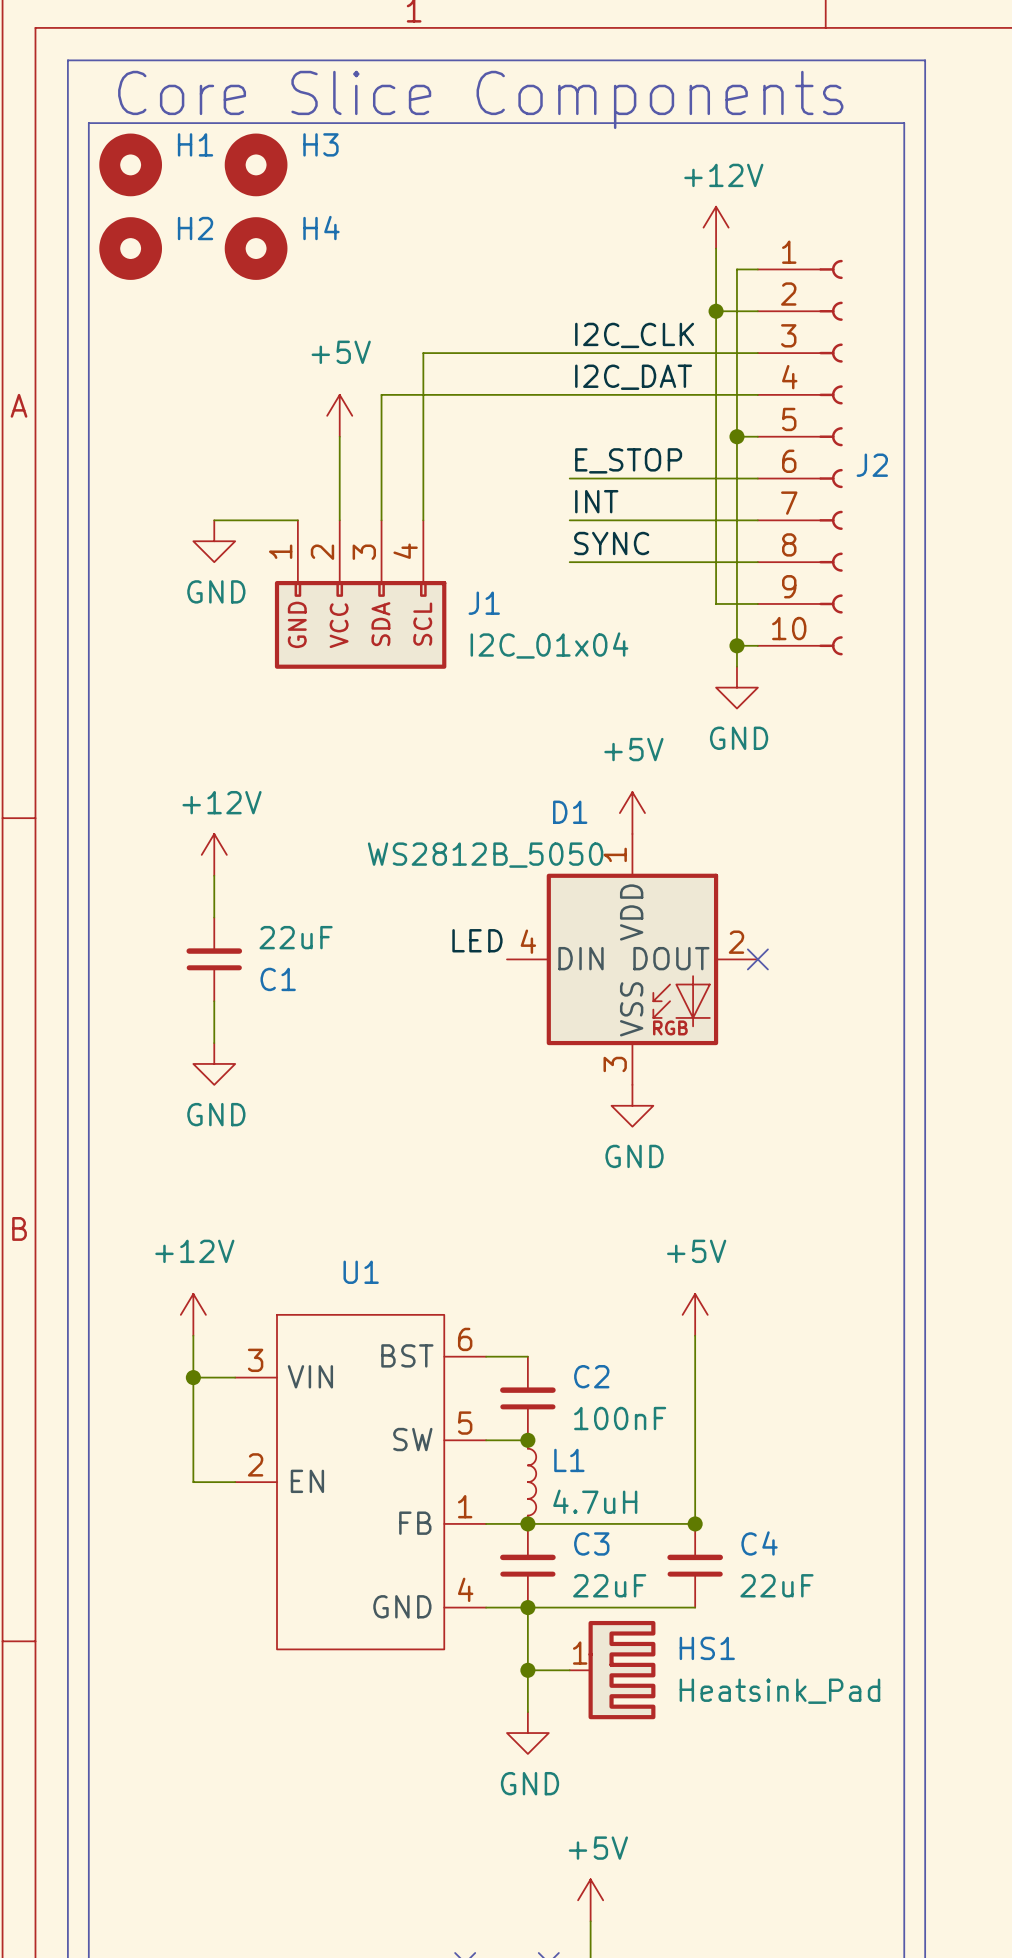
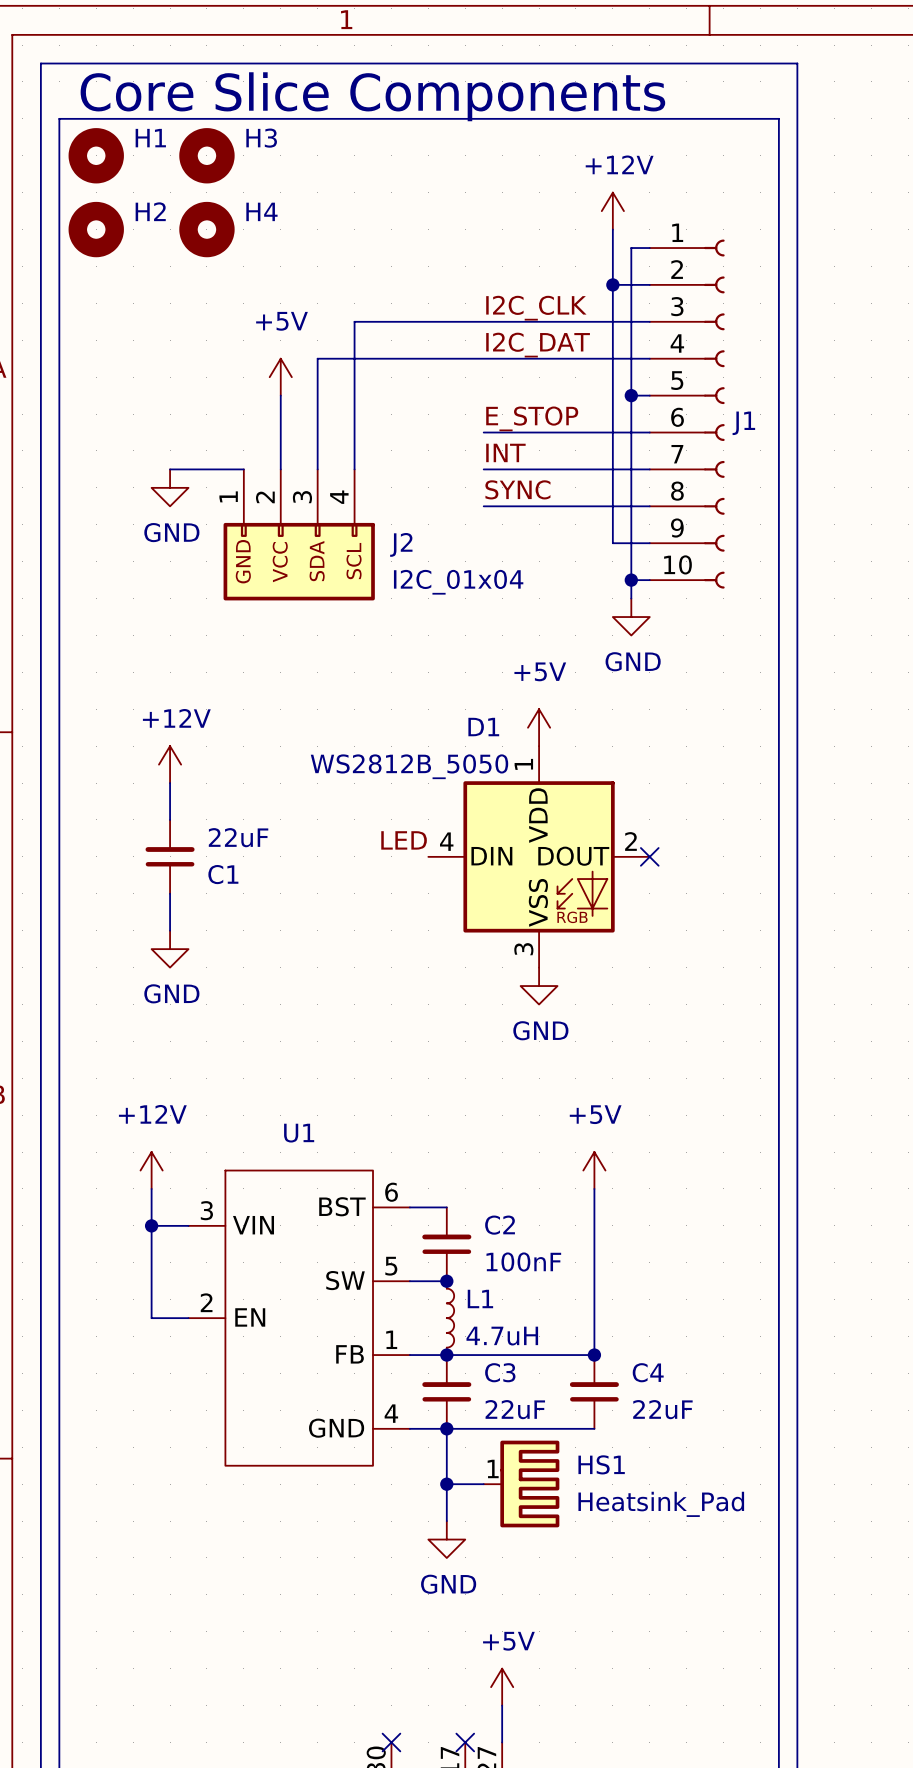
J2 name: J2 (872, 465) -> J1 (743, 423)
J1 name: J1 (484, 603) -> J2 (401, 544)

